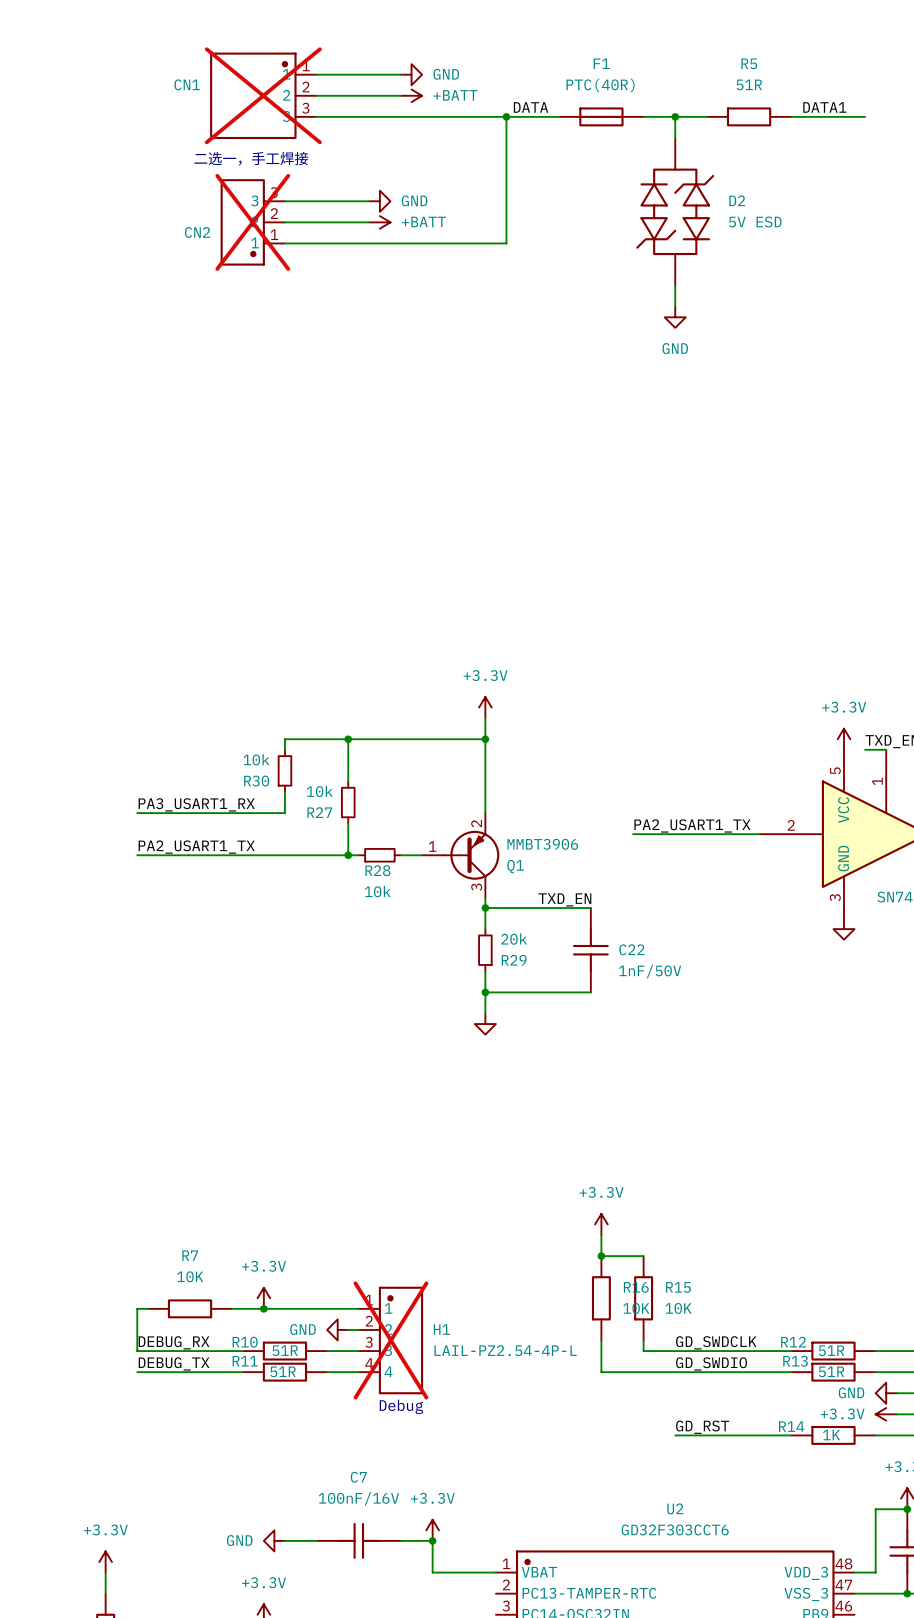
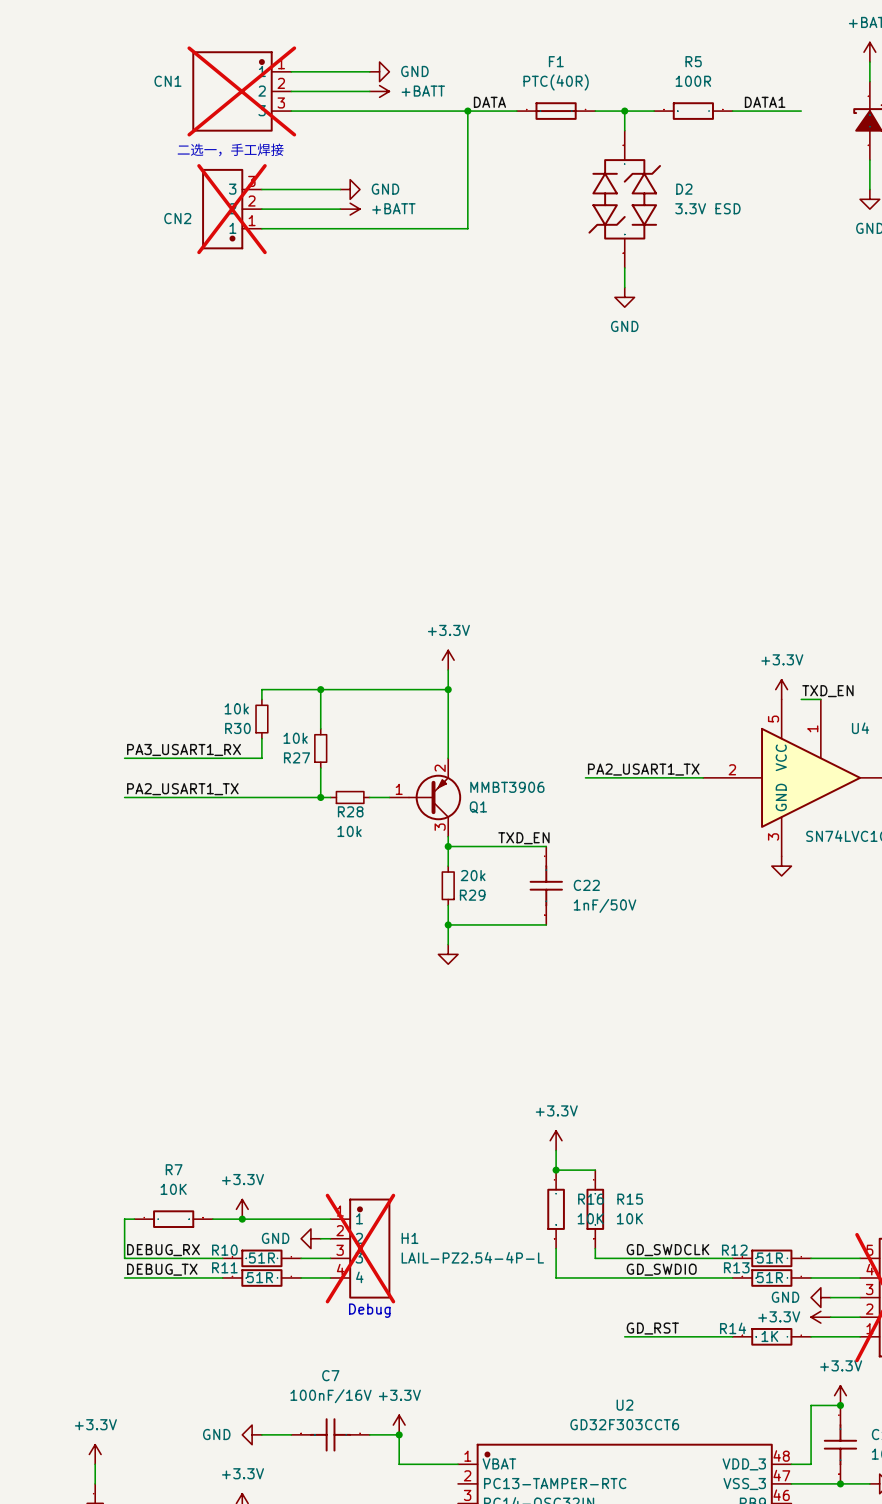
R5 value: 51R (749, 84) -> 100R (693, 81)
D2 value: 5V ESD (755, 221) -> 3.3V ESD (707, 208)

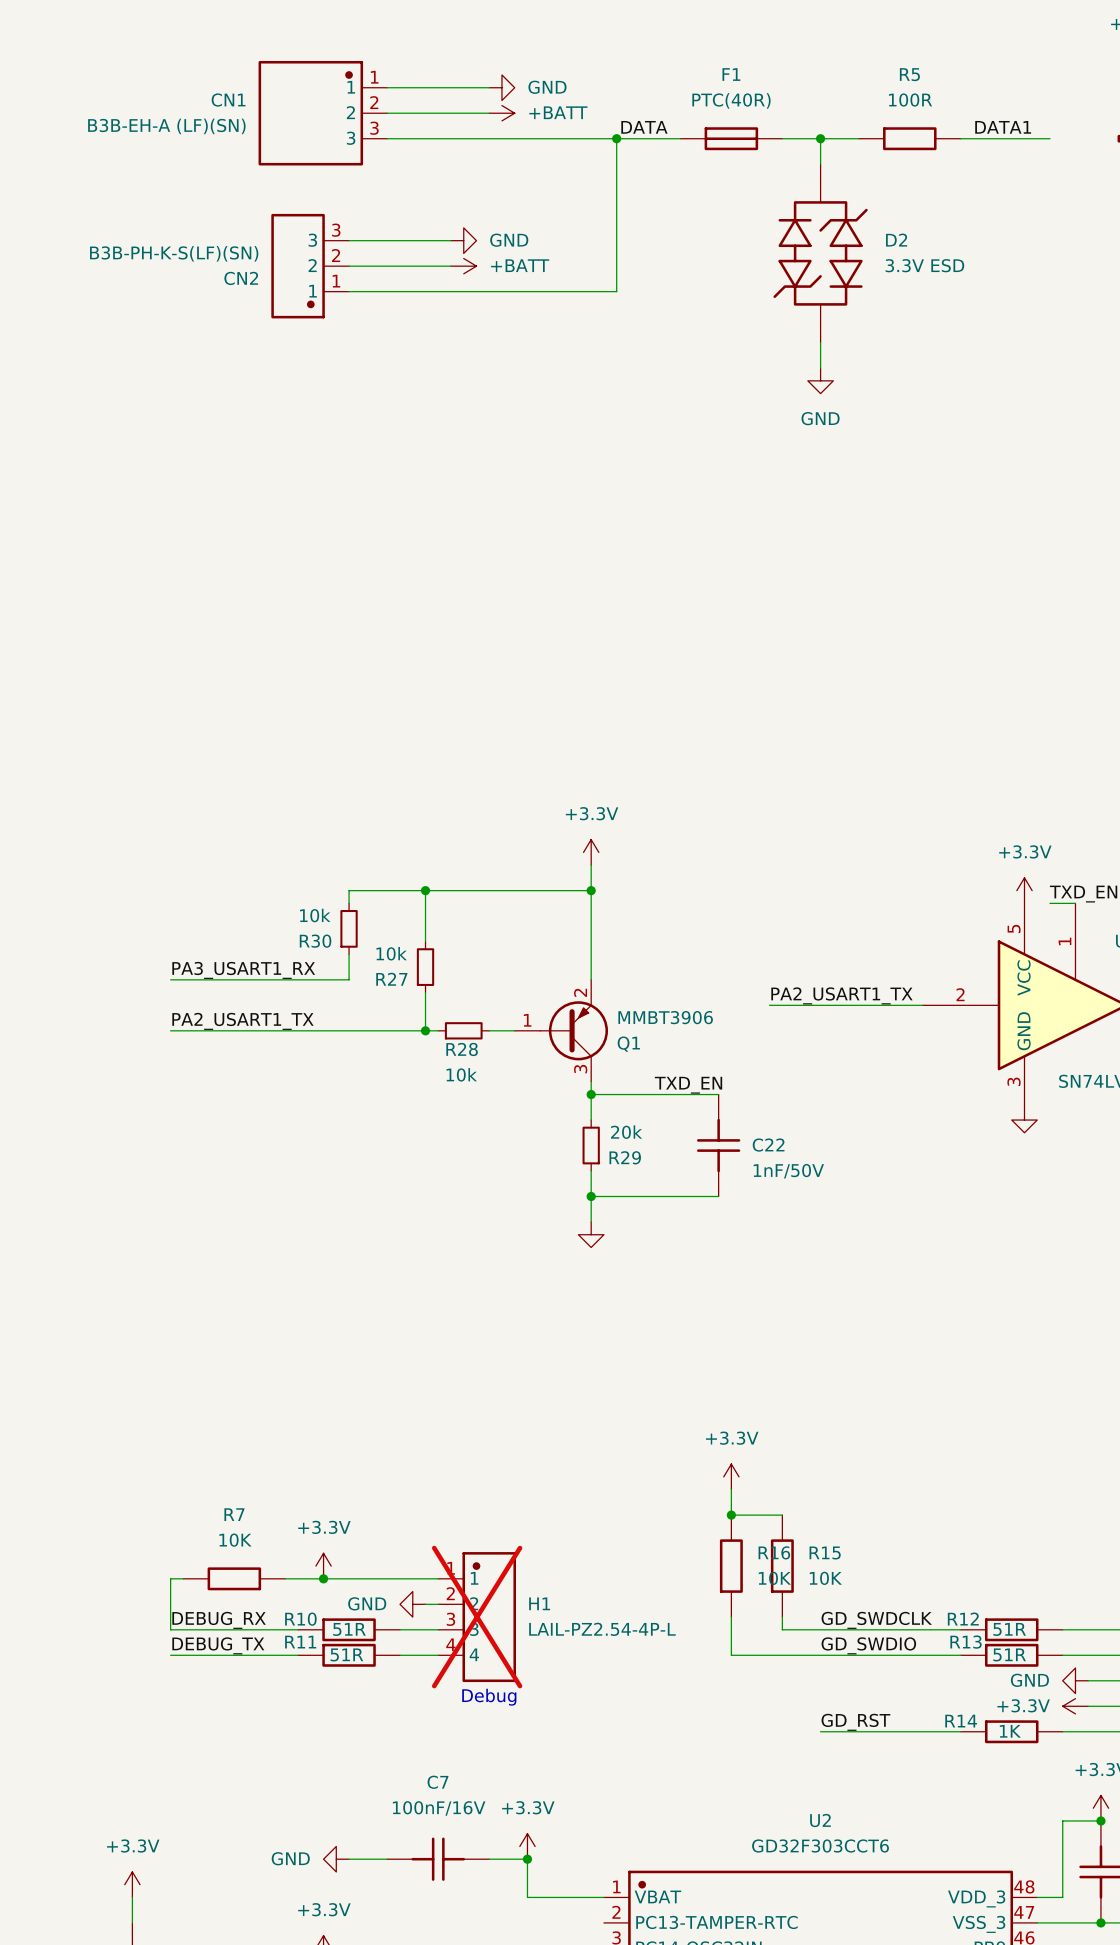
CN1 do-not-place cross: (241, 91) -> none
CN1 value: none -> B3B-EH-A (LF)(SN) (166, 126)
text: 二选一，手工焊接 (230, 149) -> none
CN2 value: none -> B3B-PH-K-S(LF)(SN) (174, 253)
CN2 do-not-place cross: (232, 209) -> none

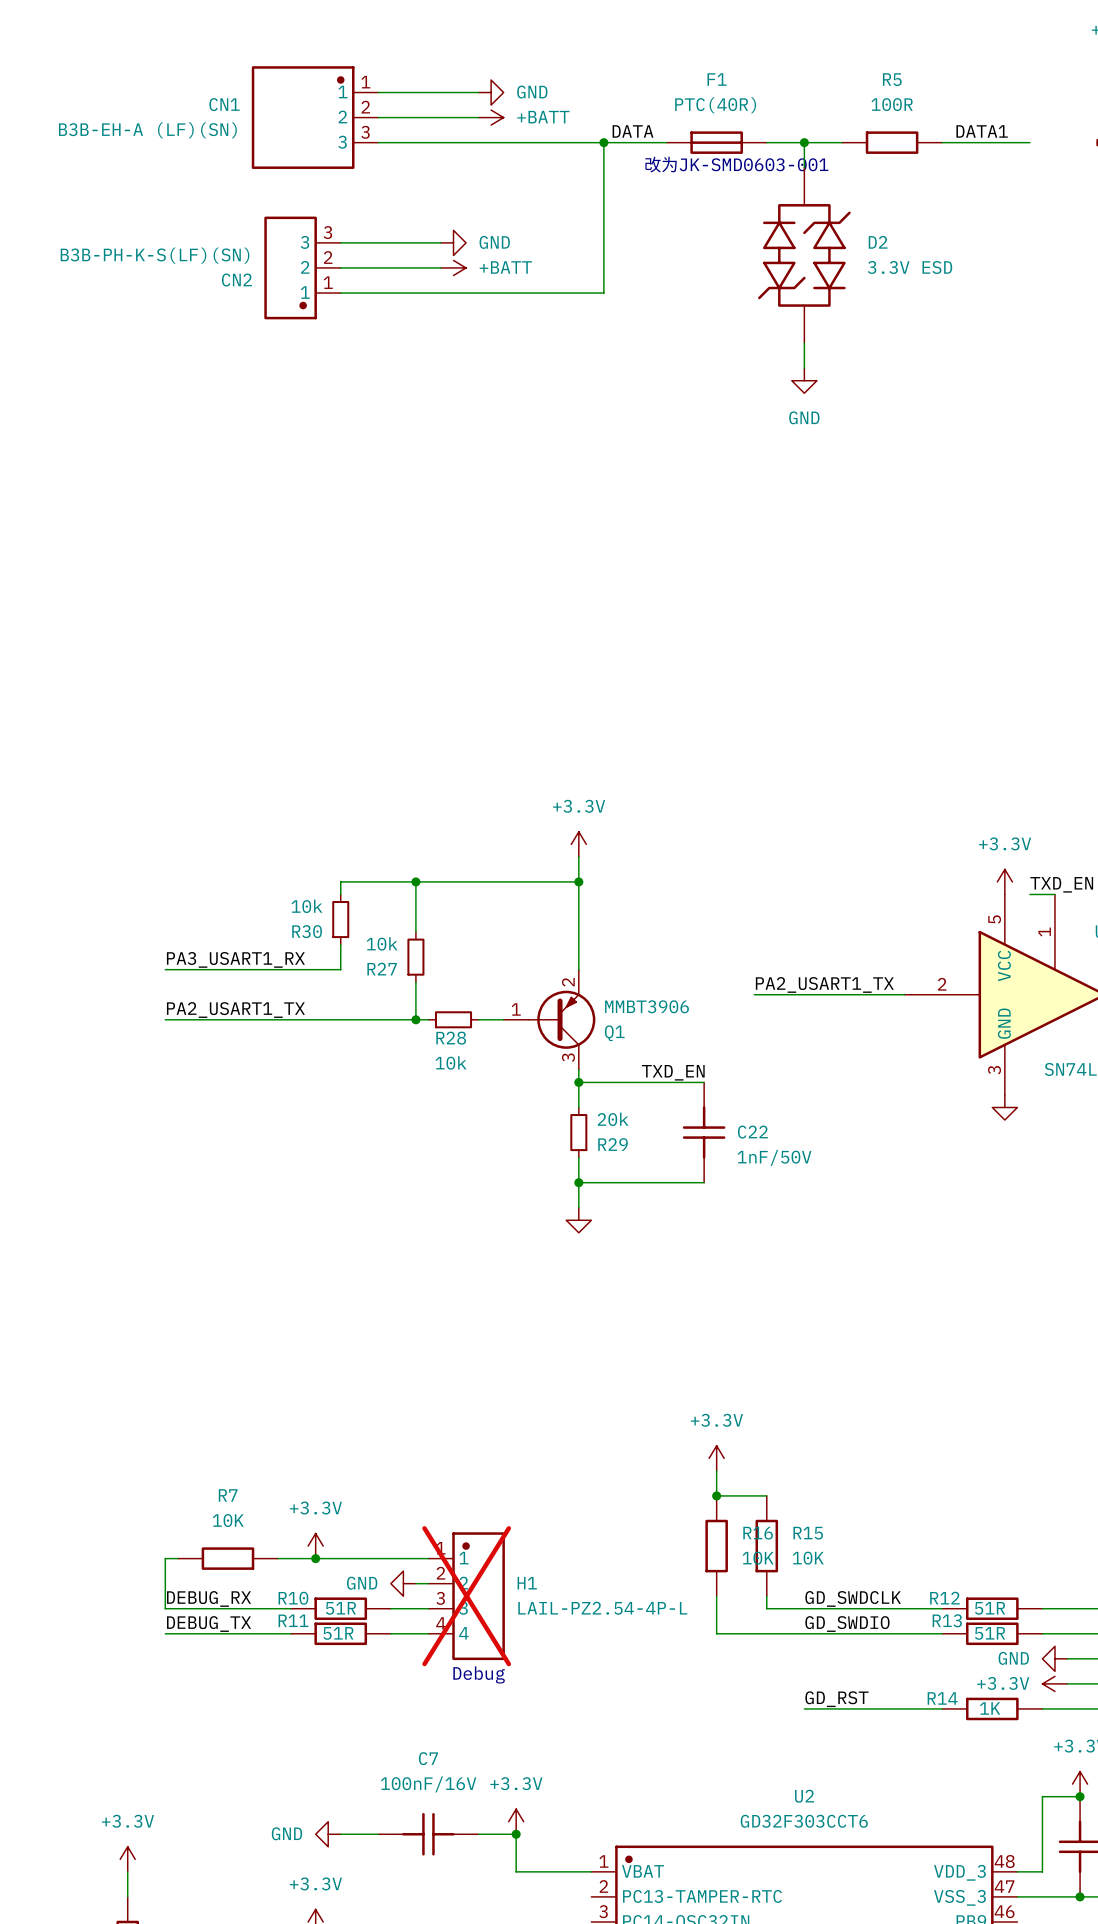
text: none -> 改为JK-SMD0603-001 (736, 164)

